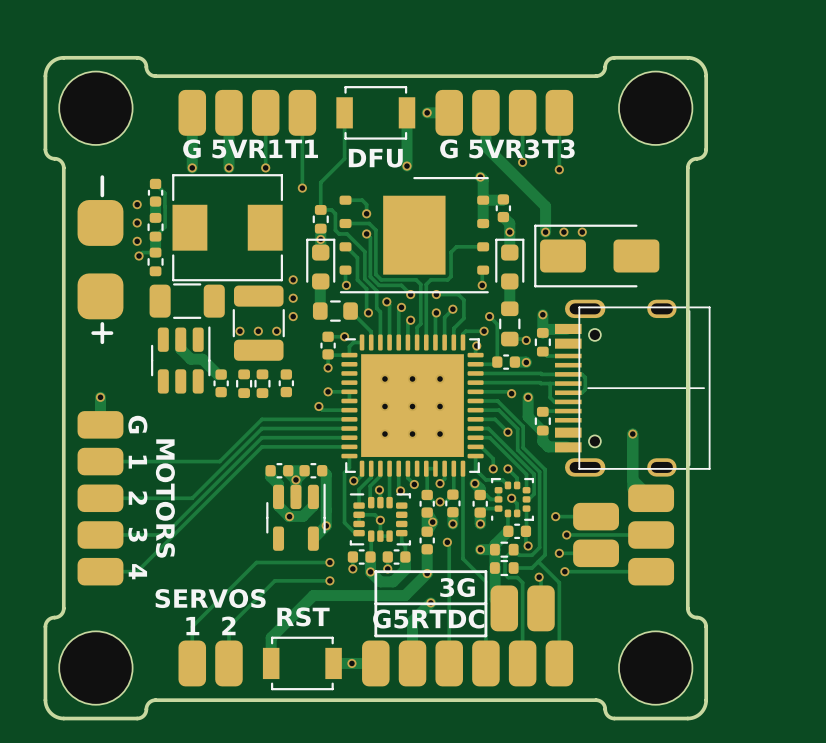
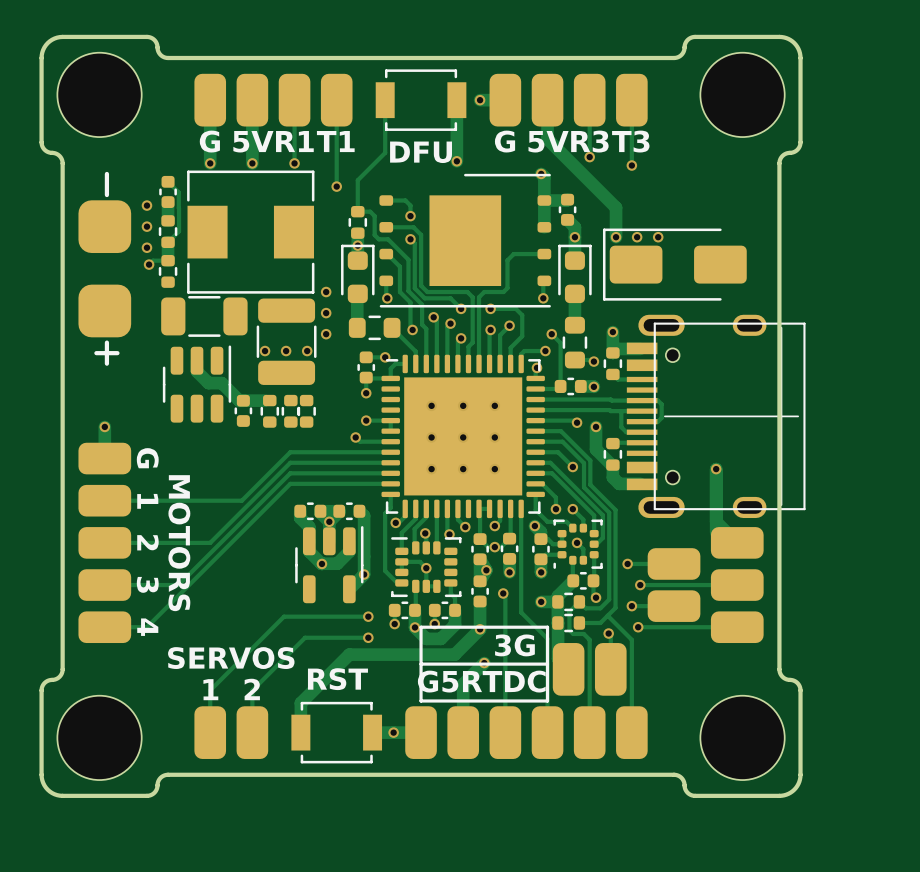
part footprint: [278, 369, 295, 398] -> [297, 394, 316, 428]
track: none -> (243, 400) (264, 400)

